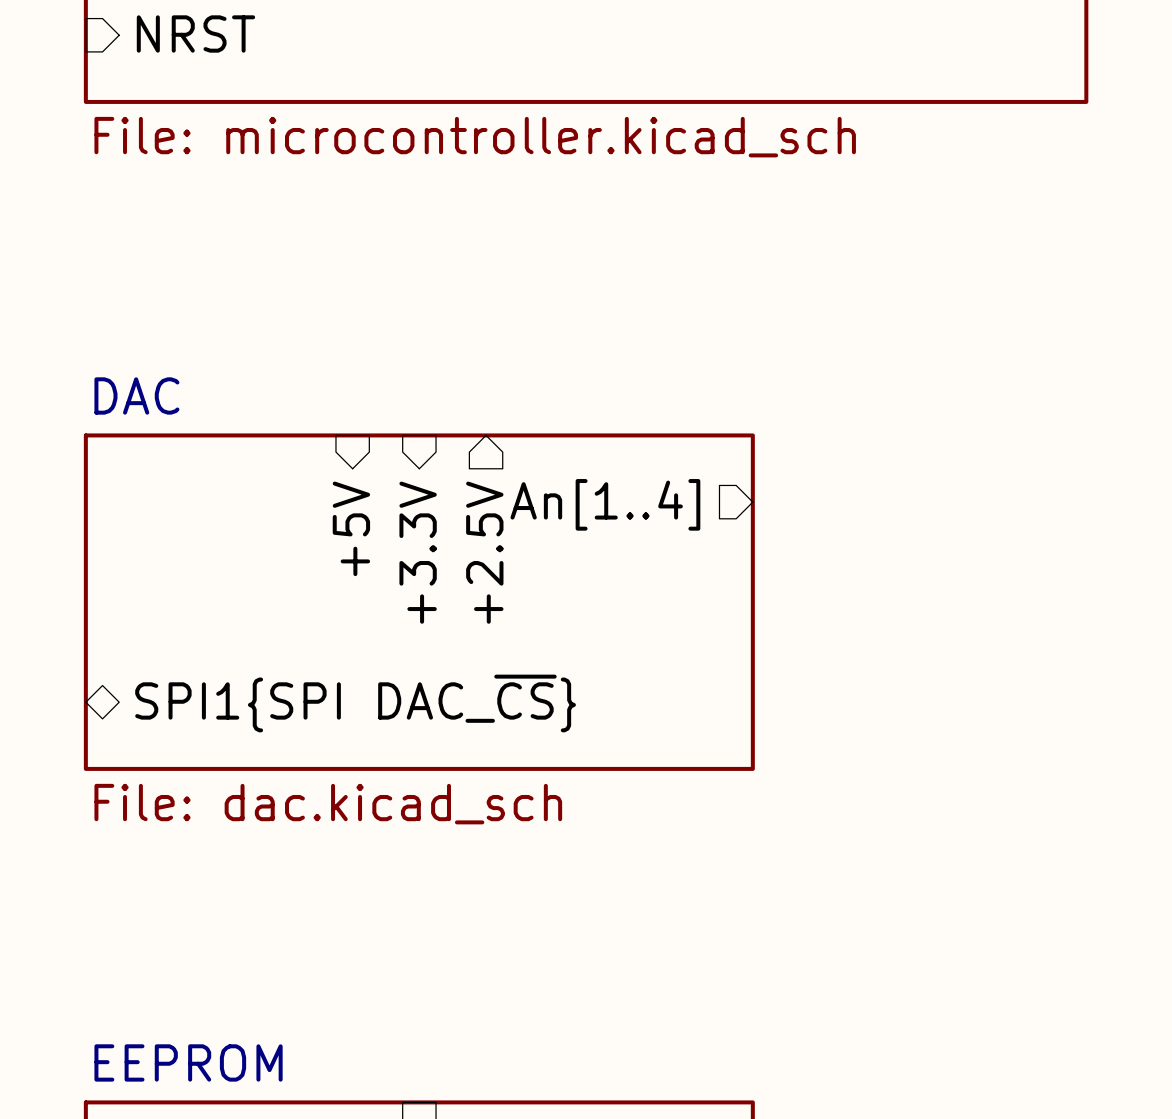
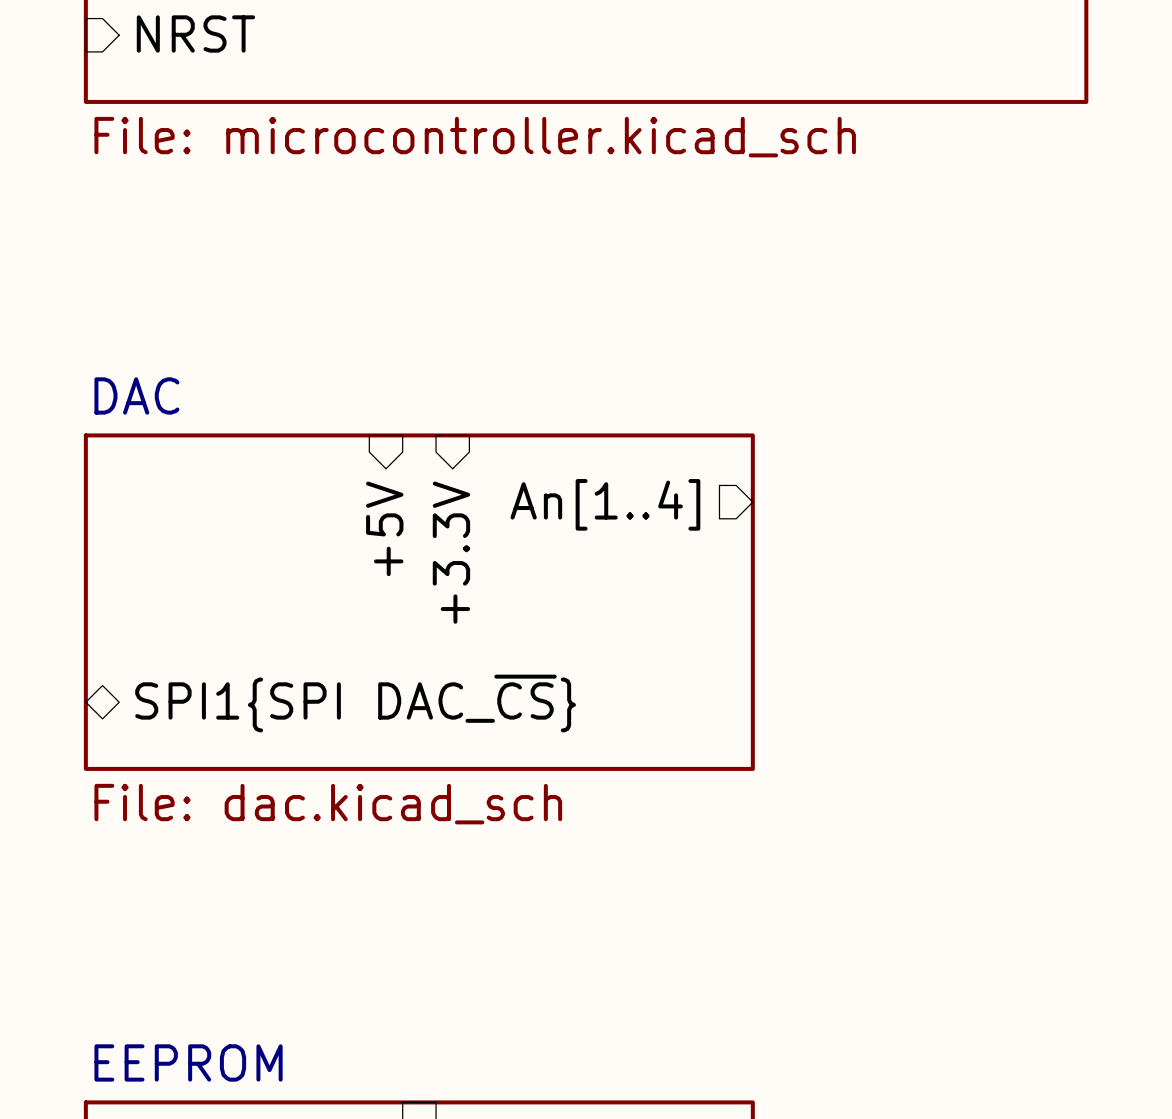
sheet pin position: +5V (351, 528) -> +5V (384, 528)
sheet pin position: +3.3V (418, 552) -> +3.3V (451, 552)
sheet pin: +2.5V (484, 552) -> none

